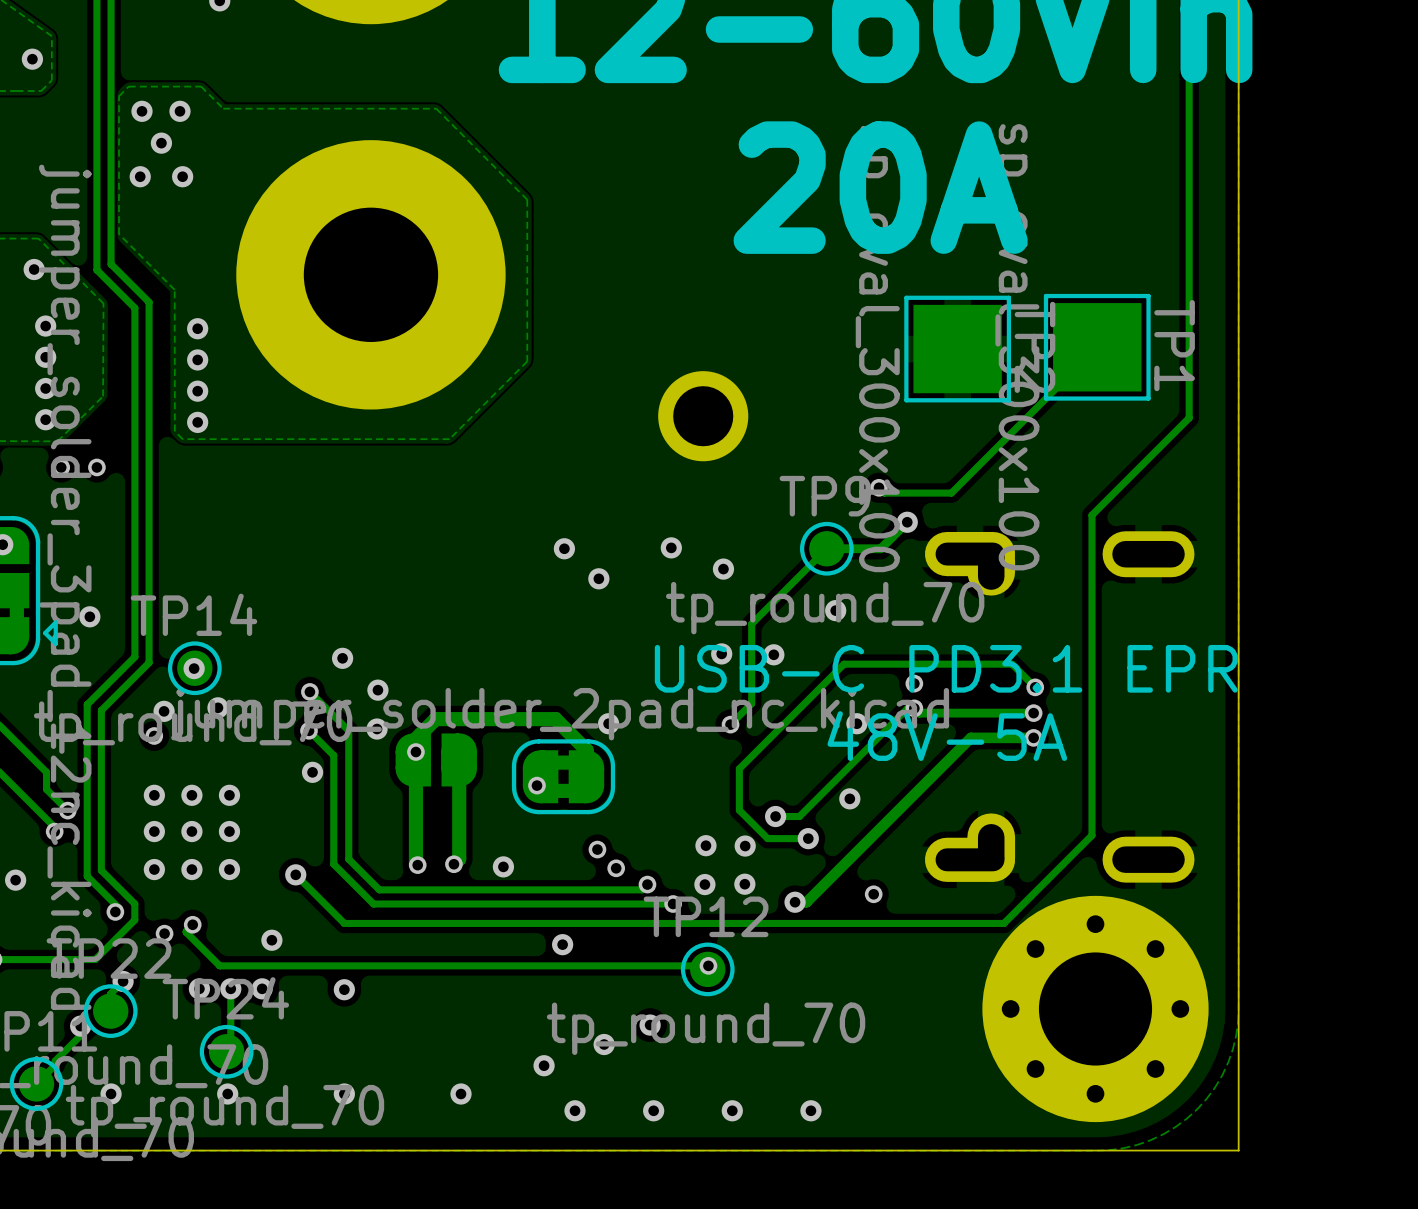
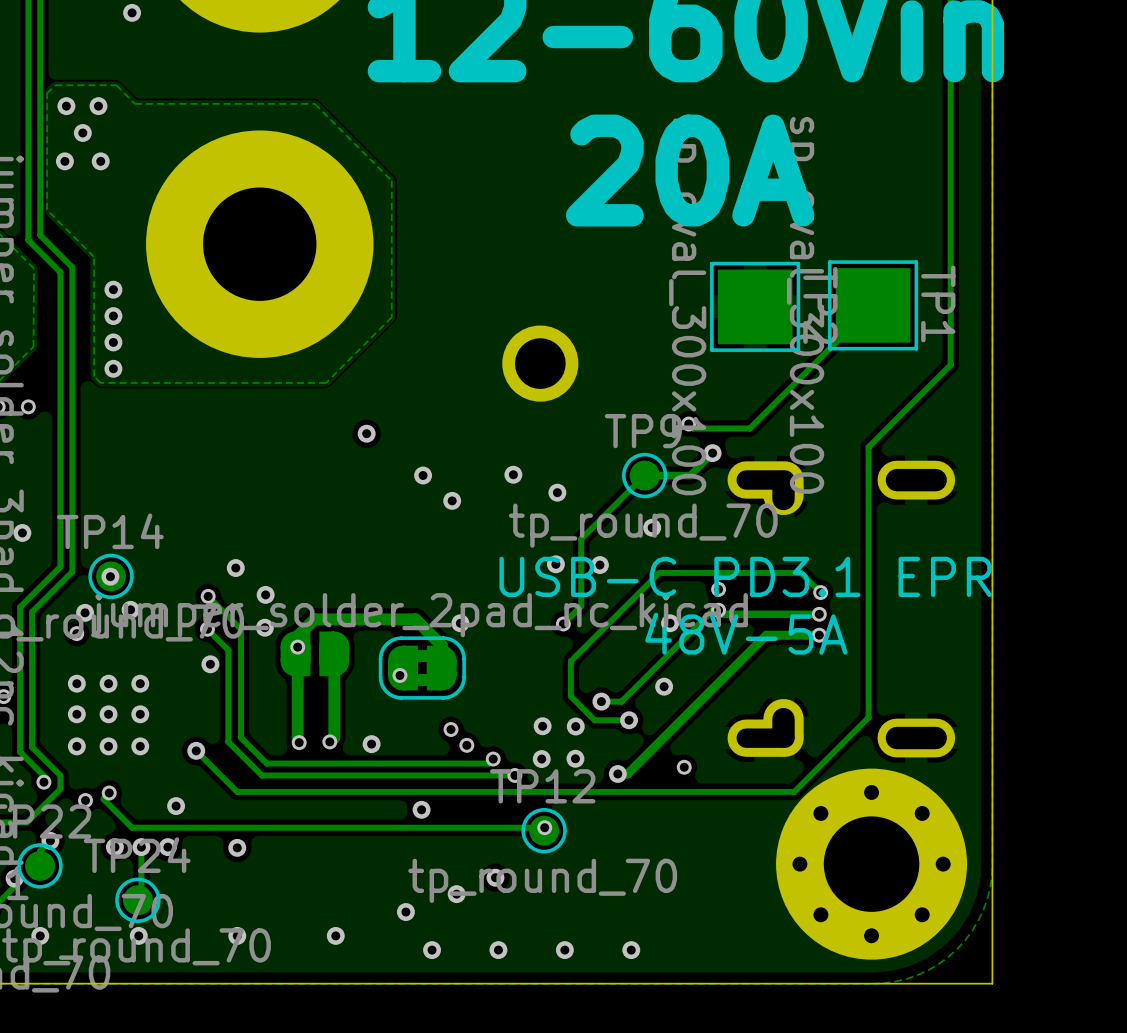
via: none -> (366, 433)

